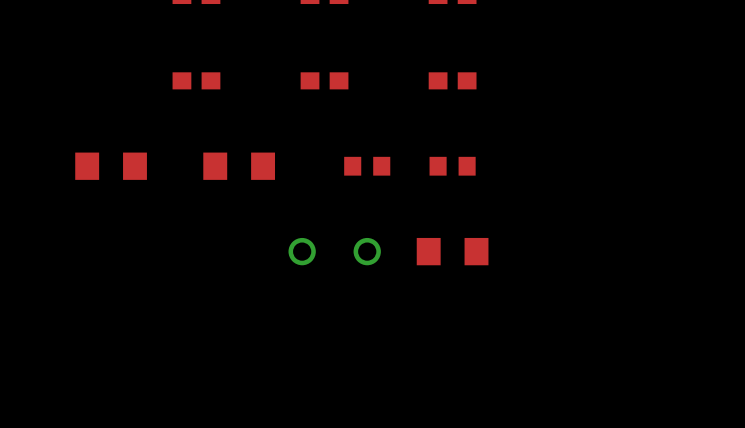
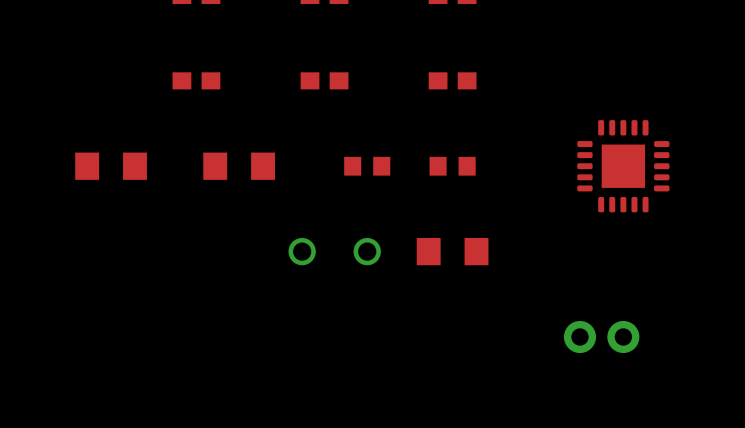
part: none -> (623, 166)
part: none -> (601, 336)

